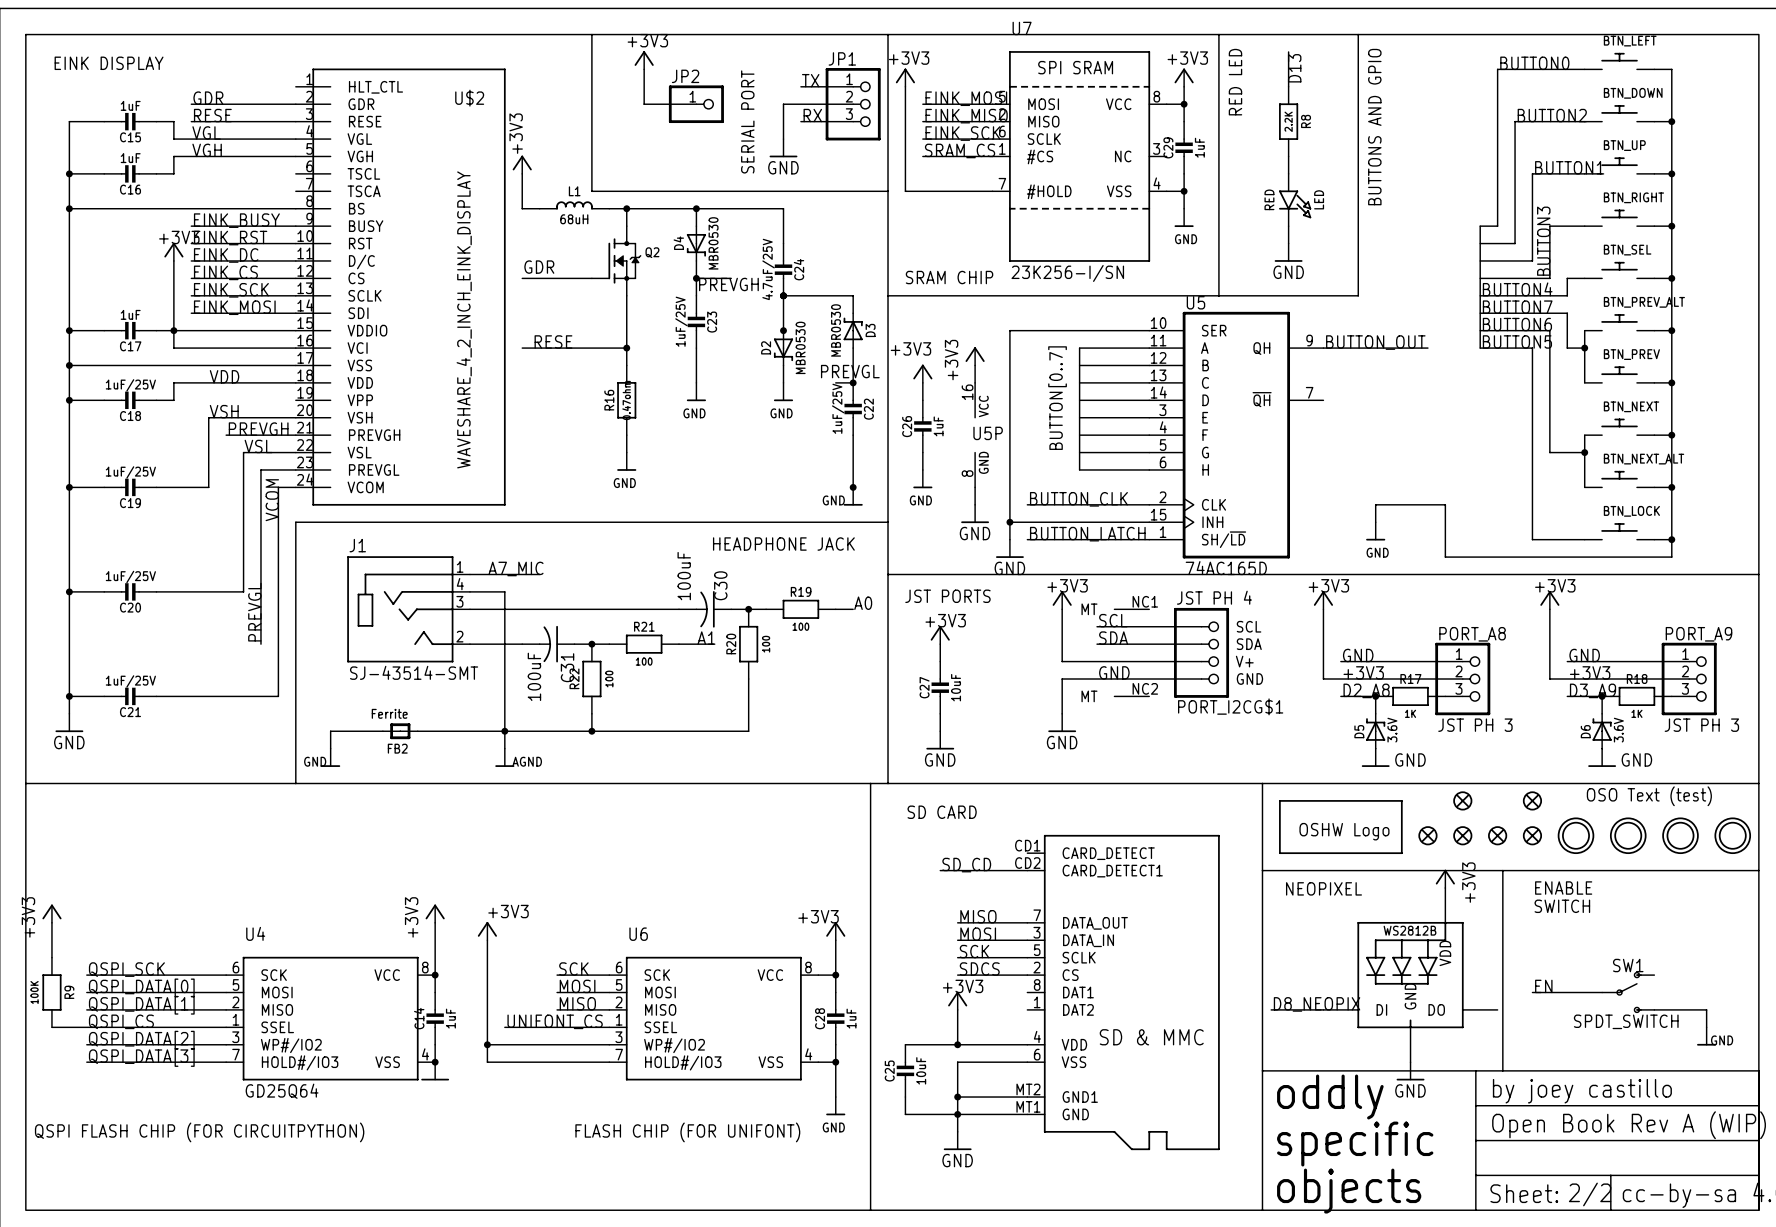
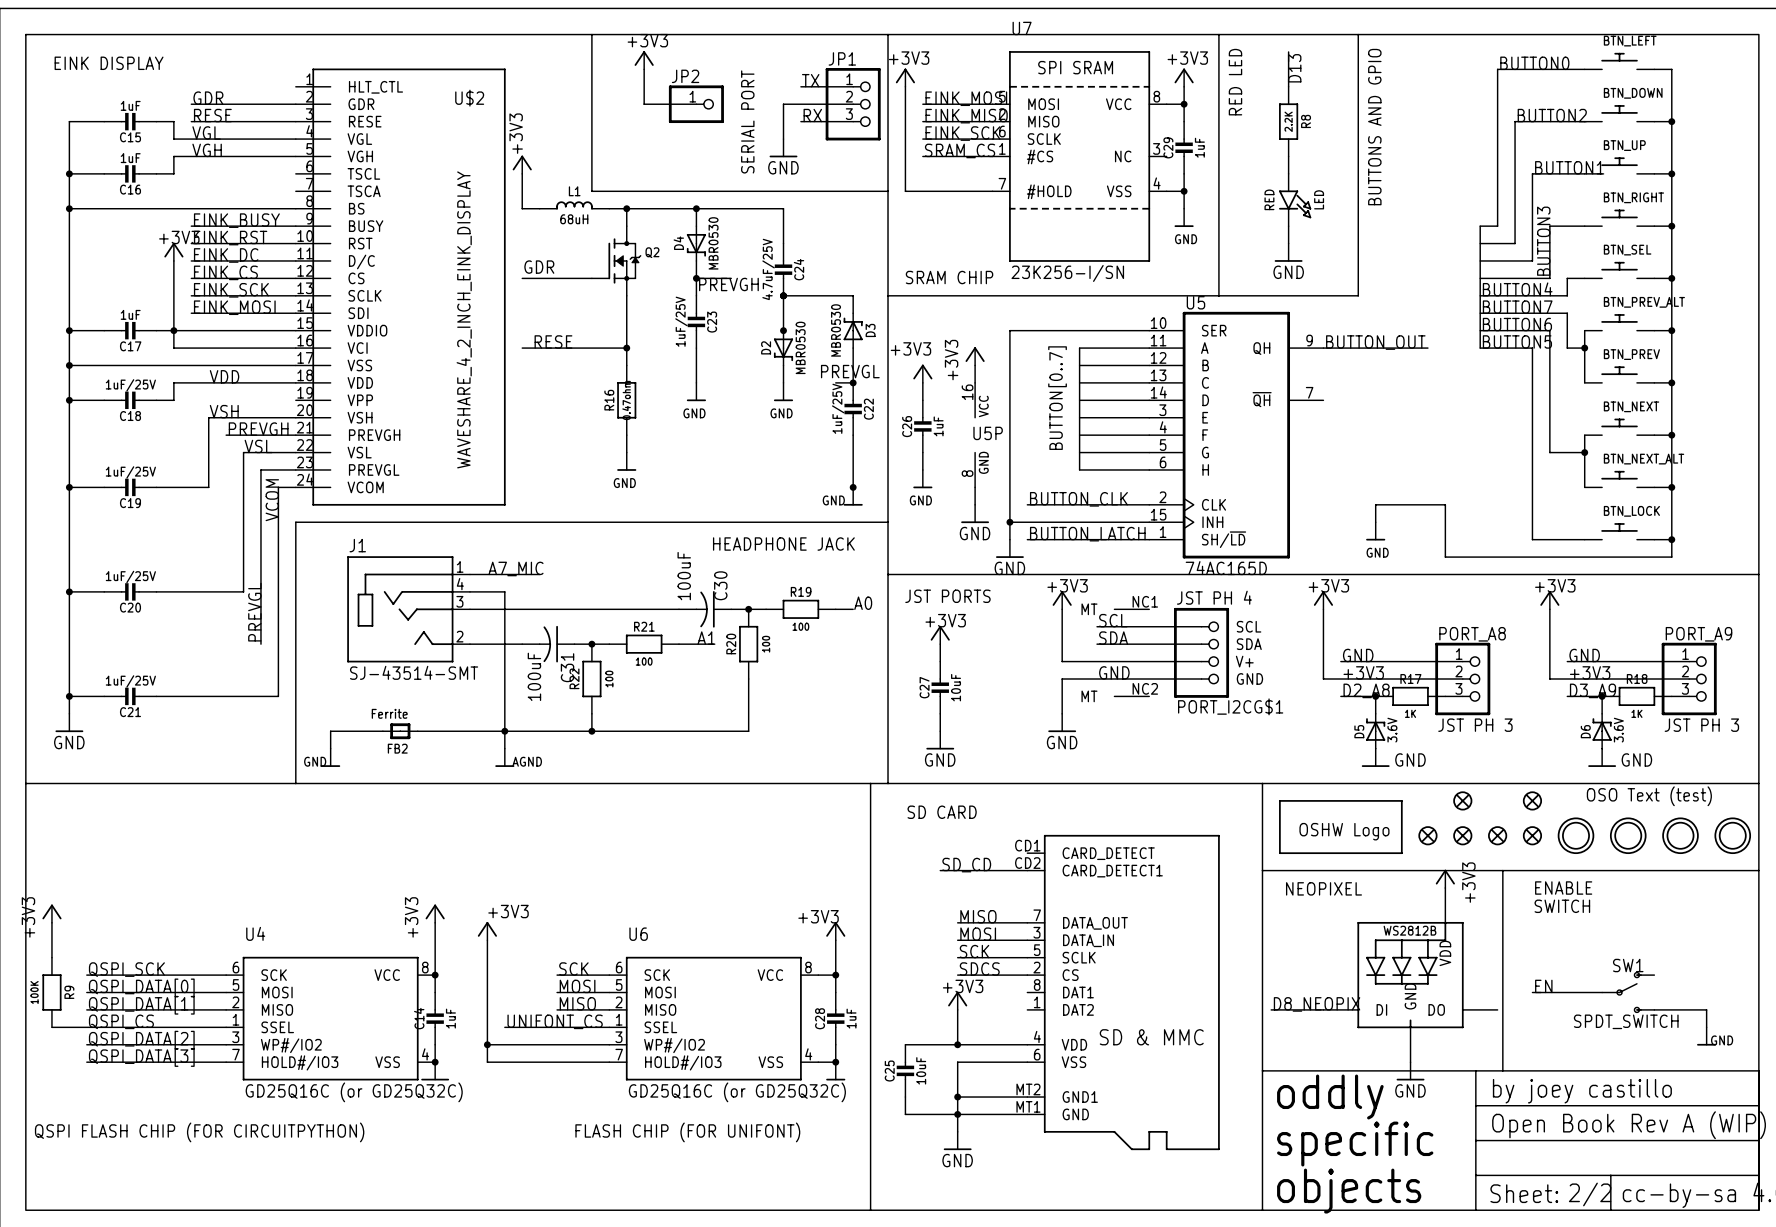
power symbol: none -> (835, 1071)
U4 value: GD25Q64 (282, 1091) -> GD25Q16C (or GD25Q32C) (354, 1092)
U6 value: none -> GD25Q16C (or GD25Q32C) (737, 1092)
power symbol: GND (835, 1106) -> none

